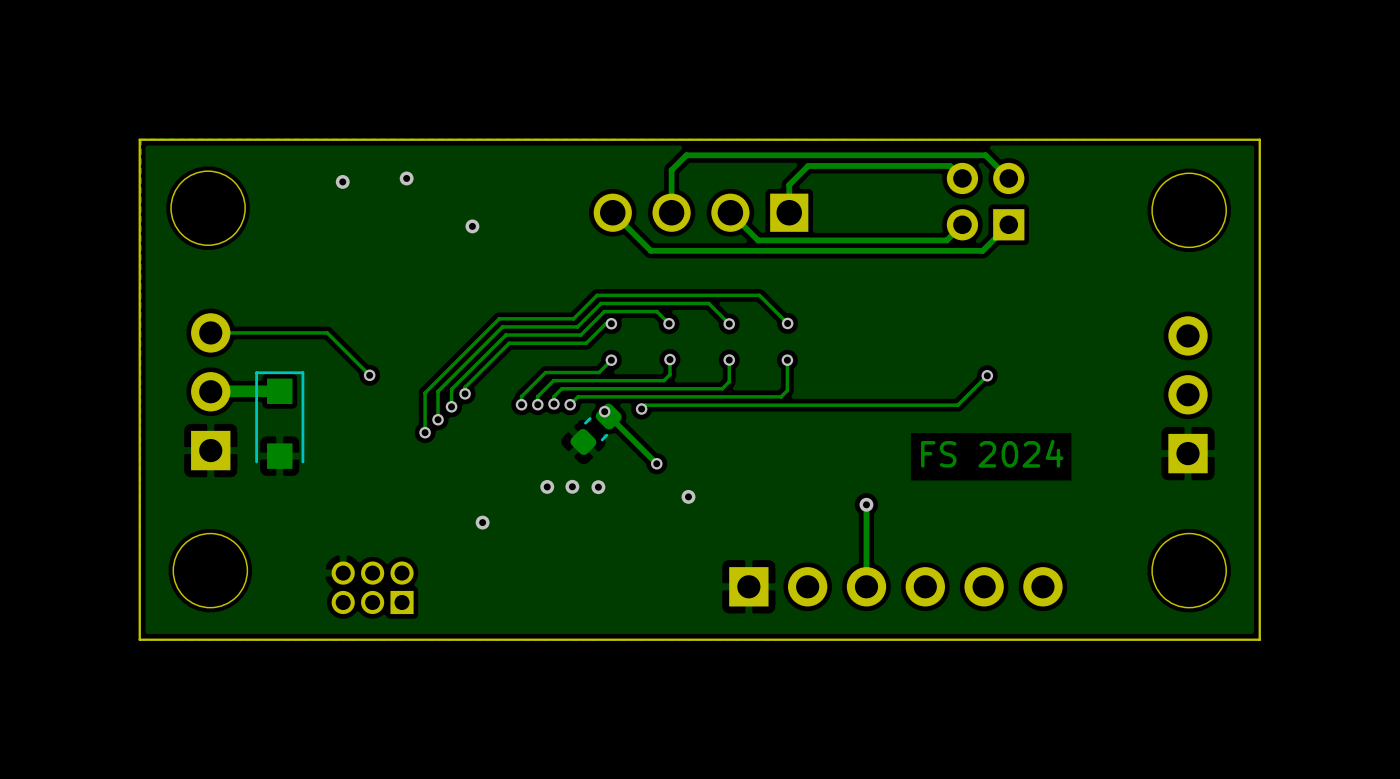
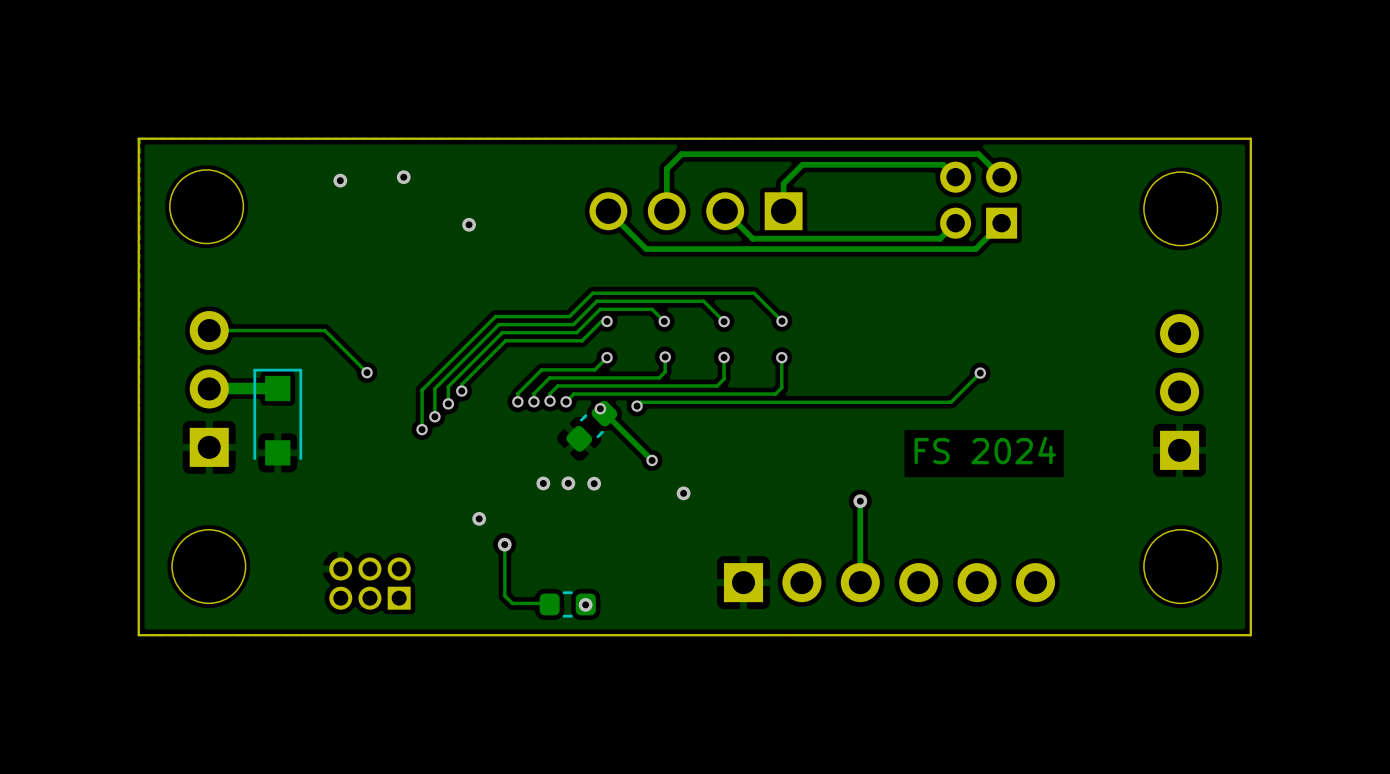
track: none -> (504, 545) (504, 595) (512, 603) (547, 603)
via: none -> (504, 544)
part: none -> (567, 604)
via: none -> (585, 604)

